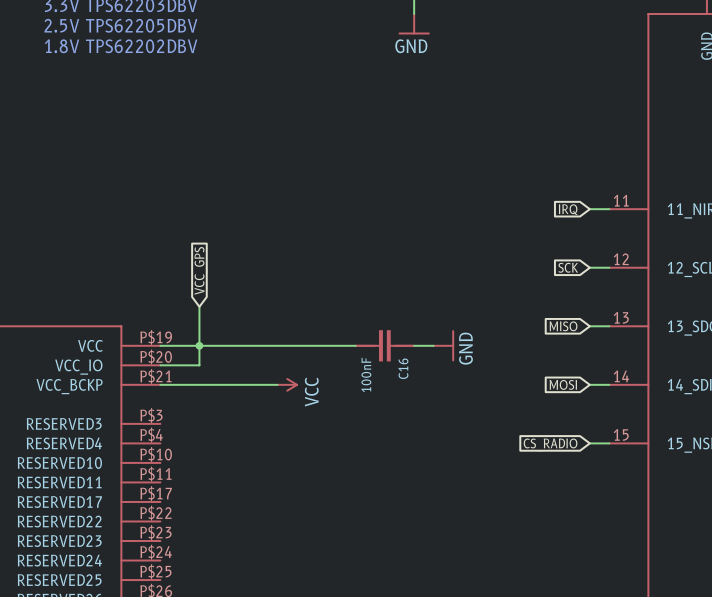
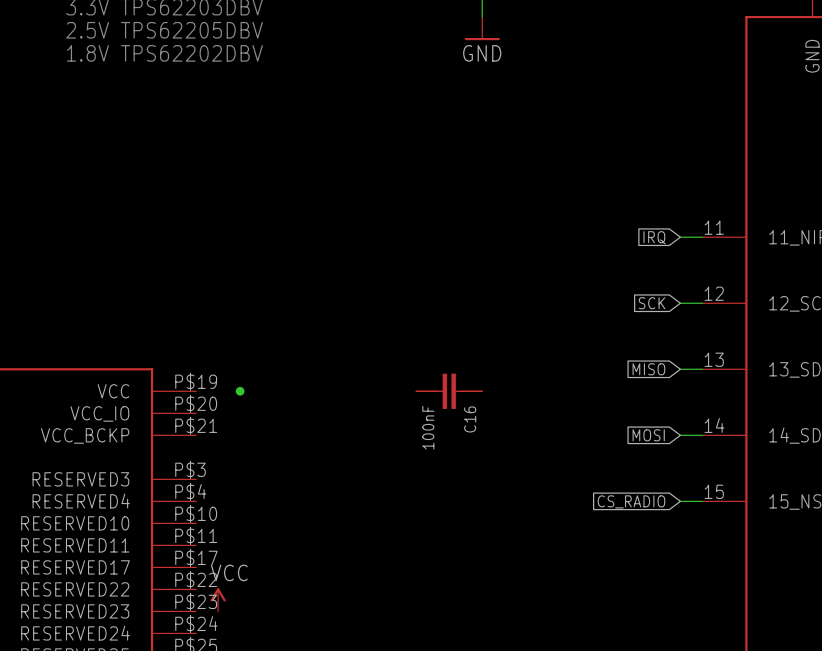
global label: VCC_GPS (200, 270) -> none
wire: (199, 306) (199, 365) (160, 365) -> none
wire: (160, 345) (355, 345) -> none
wire: (414, 345) (433, 345) -> none
power symbol: GND (443, 345) -> none
wire: (160, 384) (277, 384) -> none
power symbol: VCC (287, 384) -> none
power symbol: none -> VCC (218, 599)

